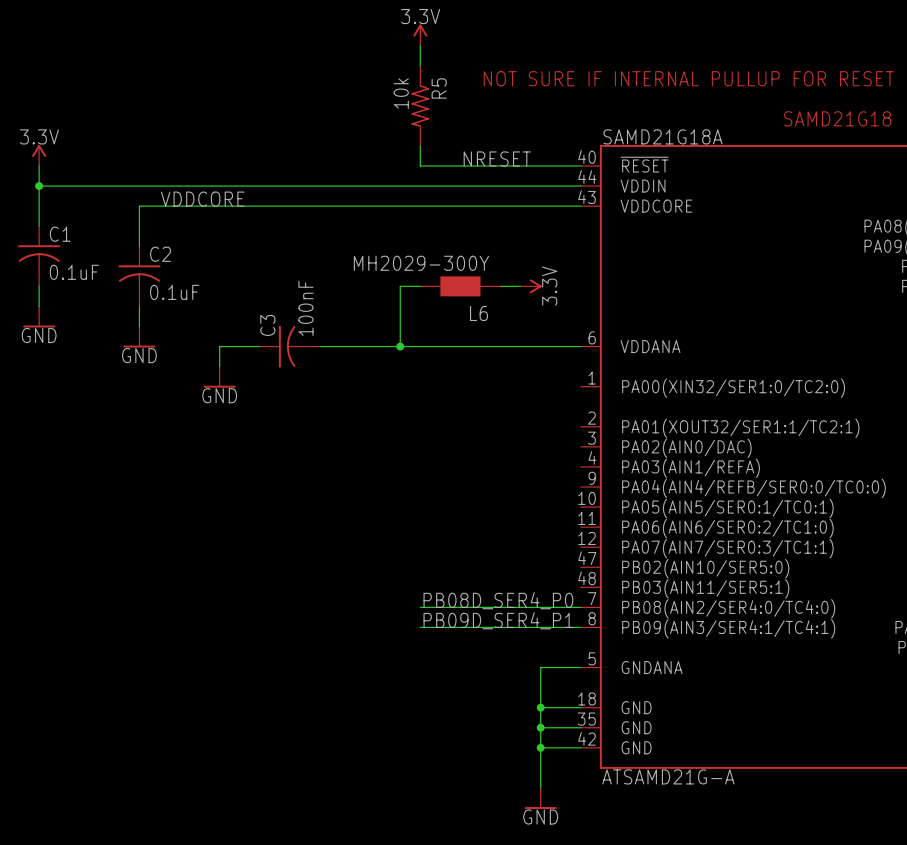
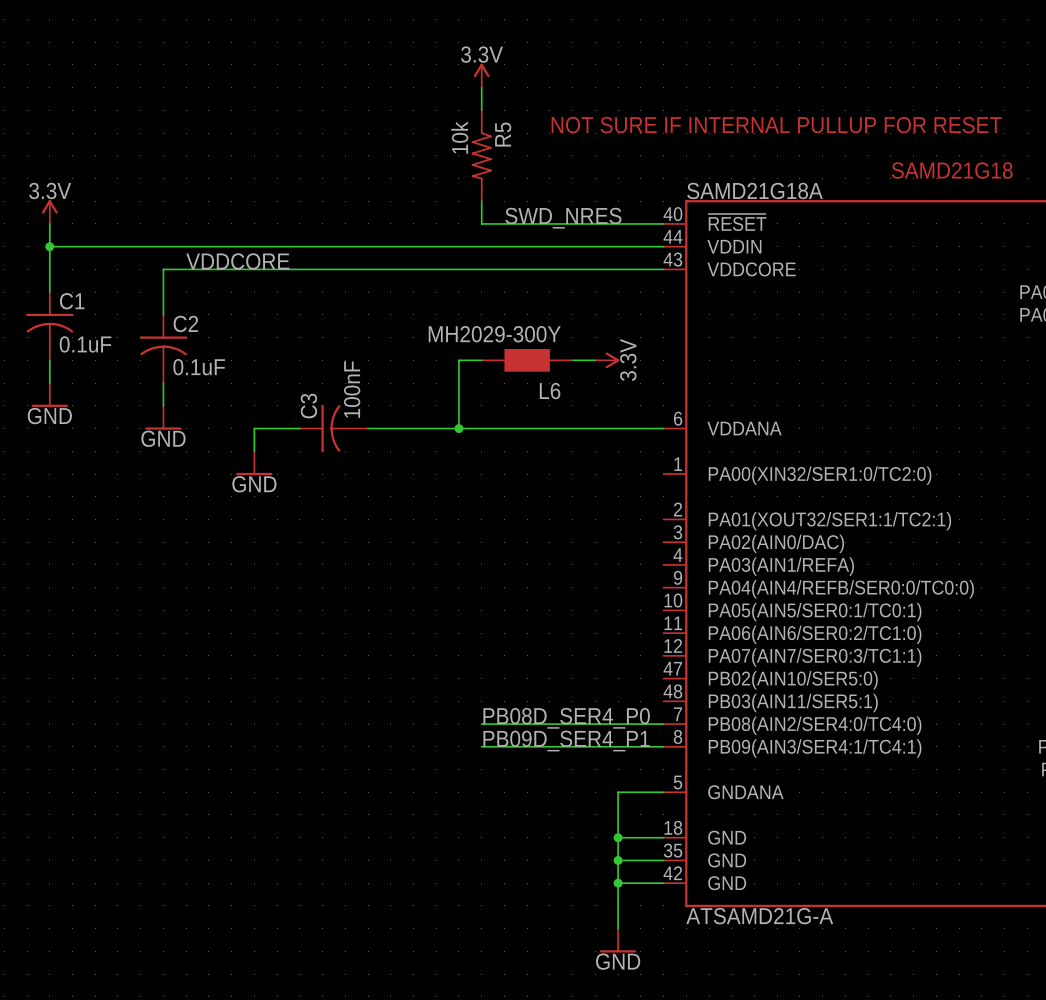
label: NRESET (497, 158) -> none
label: none -> SWD_NRES (563, 218)

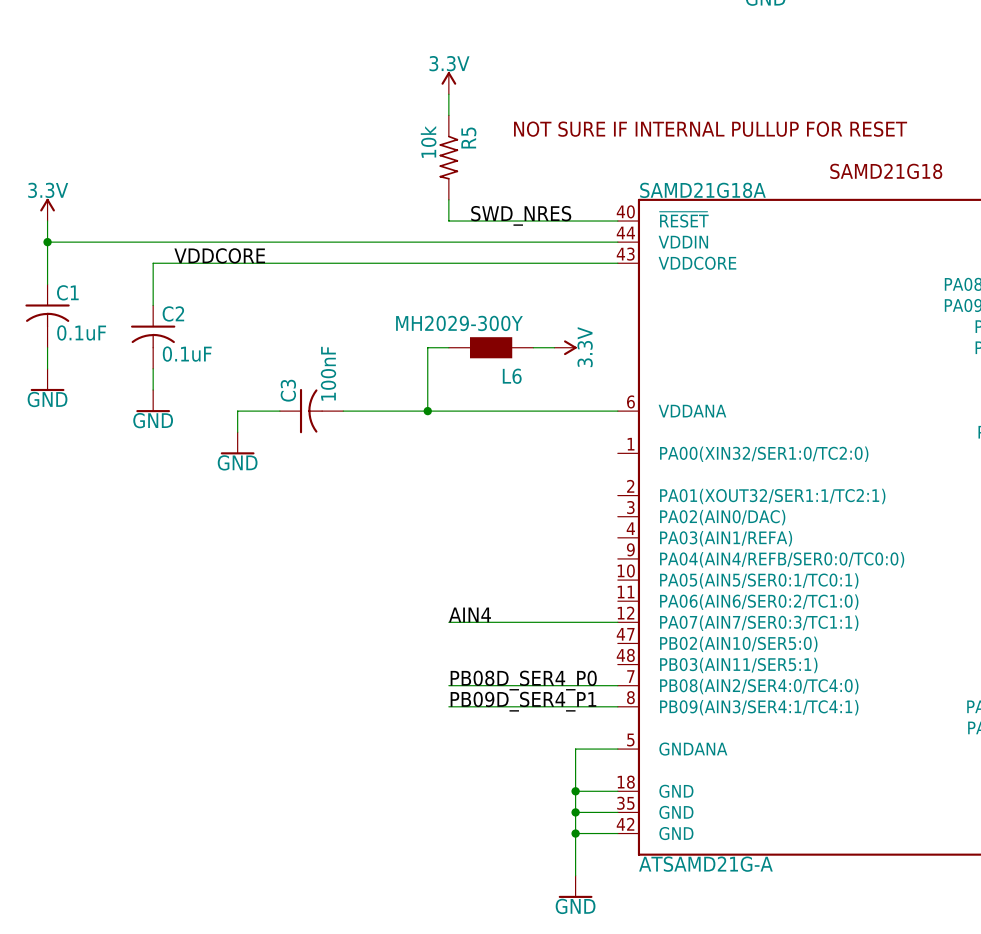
label: none -> AIN4 (469, 614)
wire: none -> (448, 622) (617, 622)

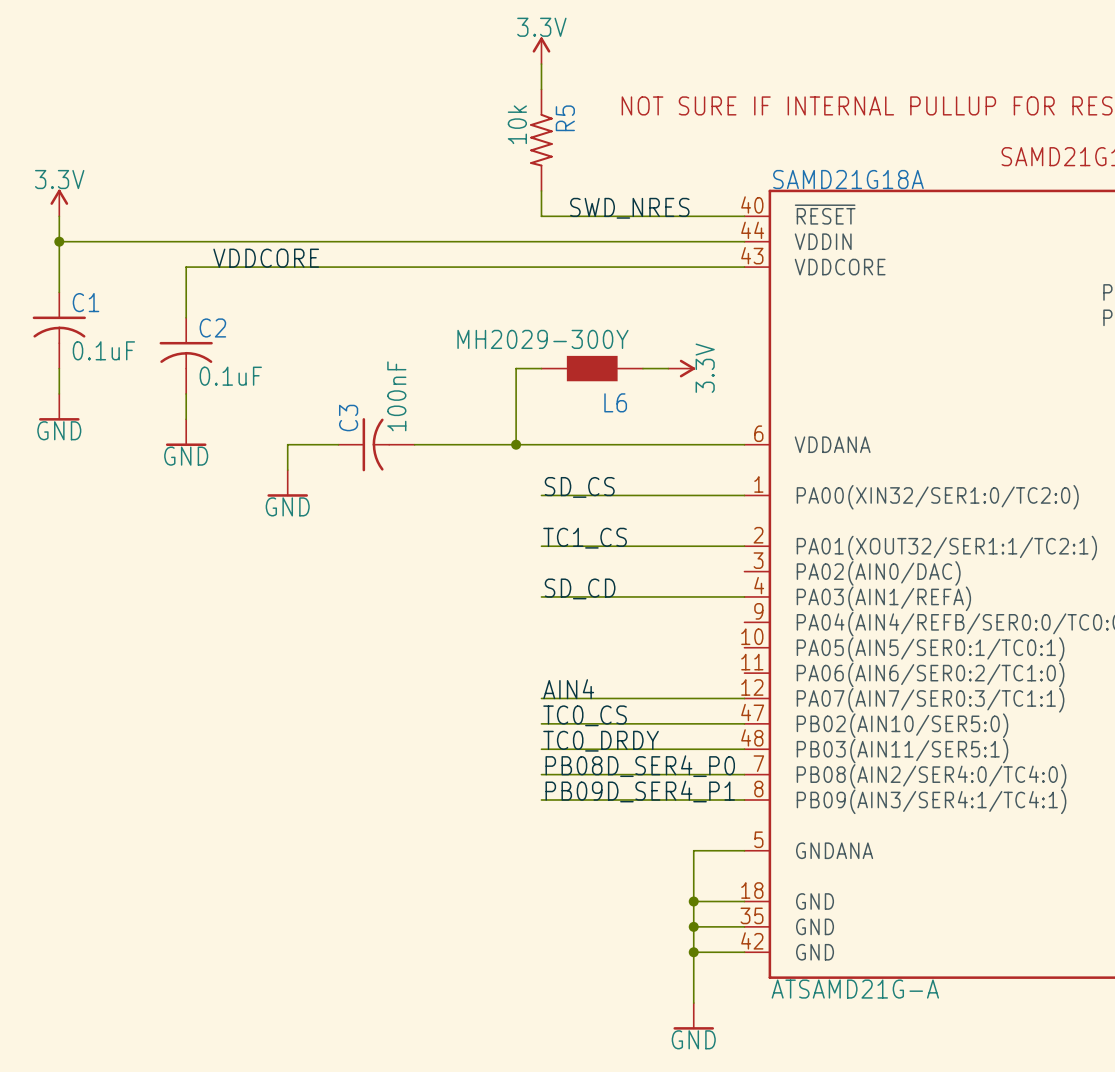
label: none -> SD_CS (579, 487)
wire: none -> (541, 495) (744, 495)
label: none -> TC1_CS (585, 538)
wire: none -> (541, 546) (744, 546)
label: none -> SD_CD (580, 588)
wire: none -> (541, 596) (744, 596)
label: none -> TC0_CS (585, 715)
wire: none -> (541, 723) (744, 723)
label: none -> TC0_DRDY (601, 741)
wire: none -> (541, 749) (744, 749)

